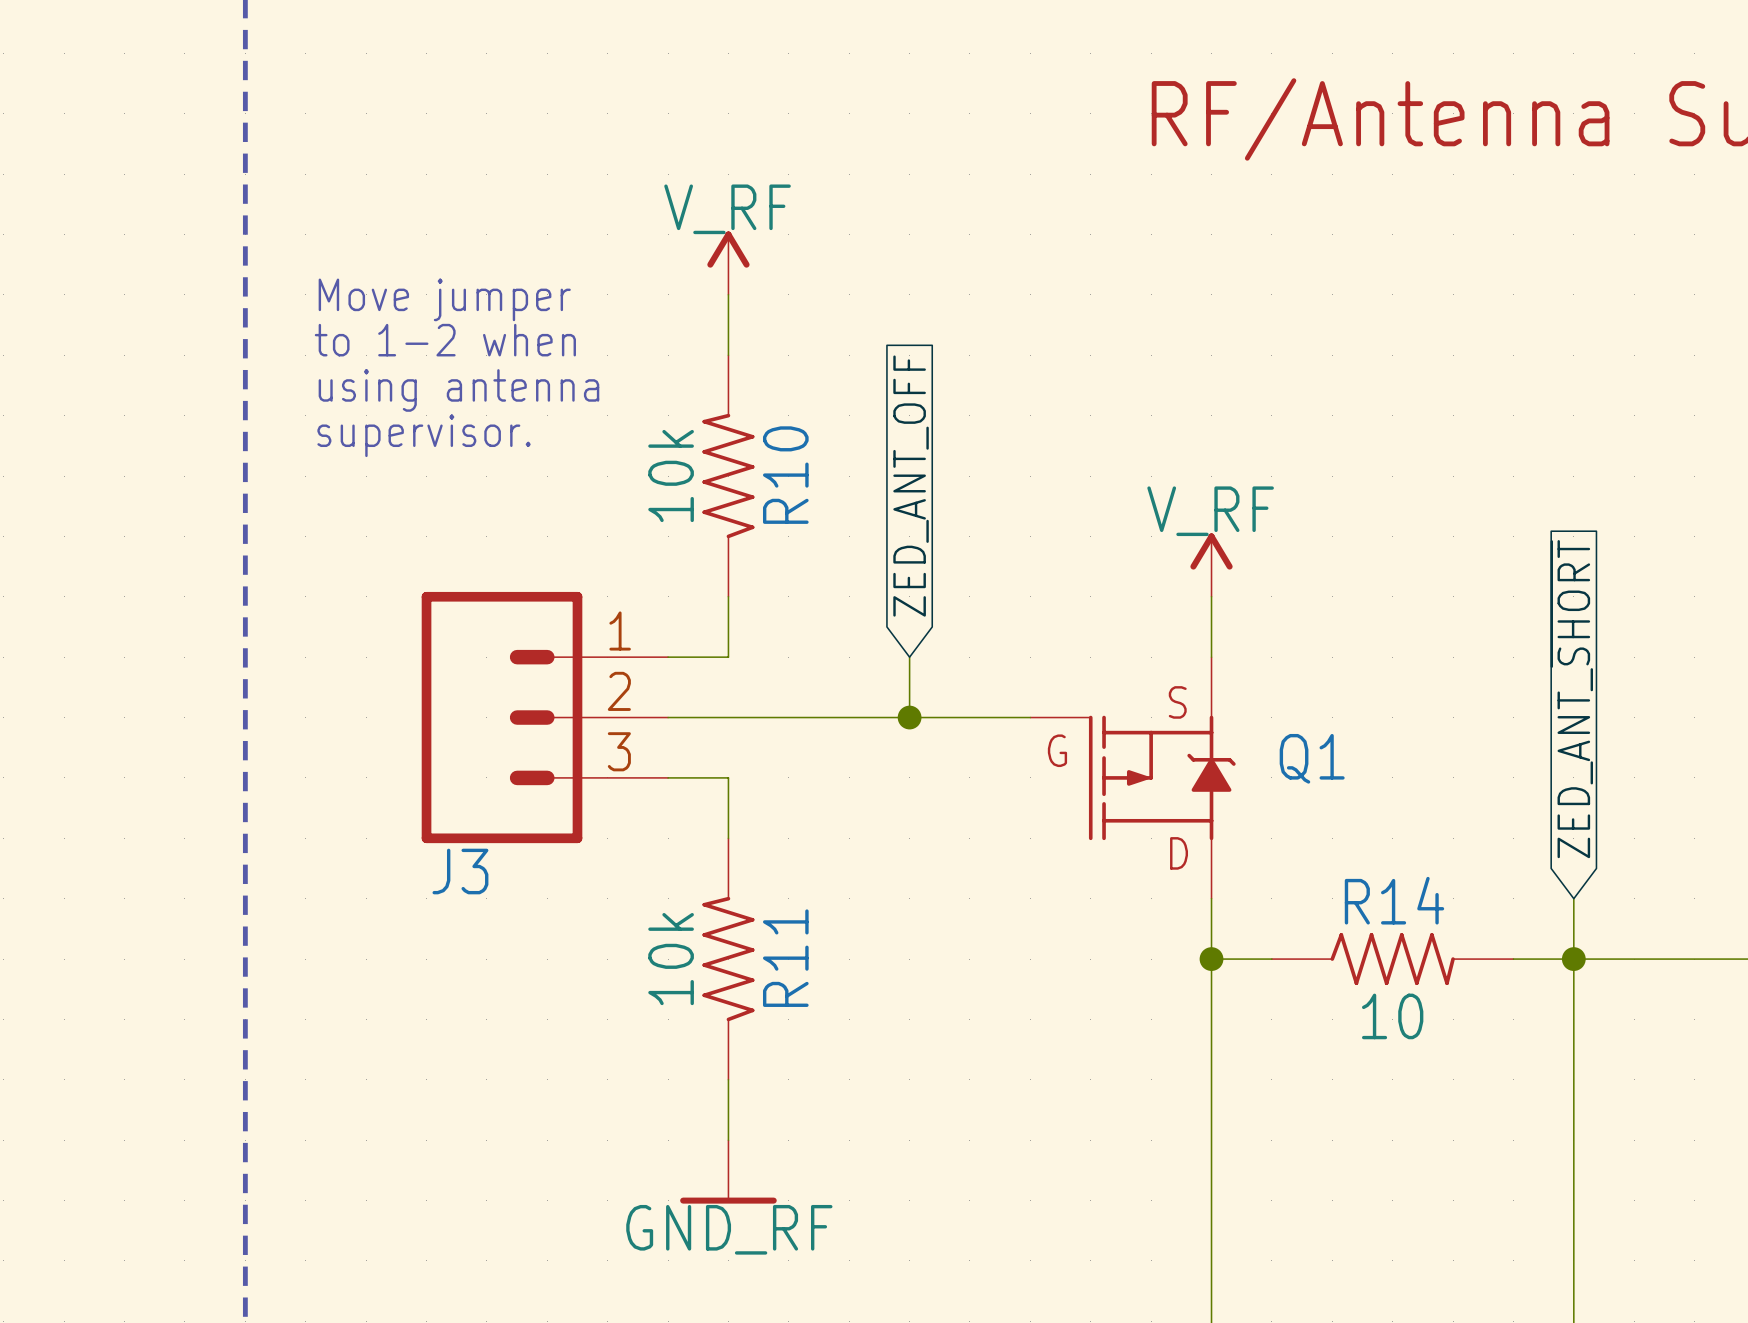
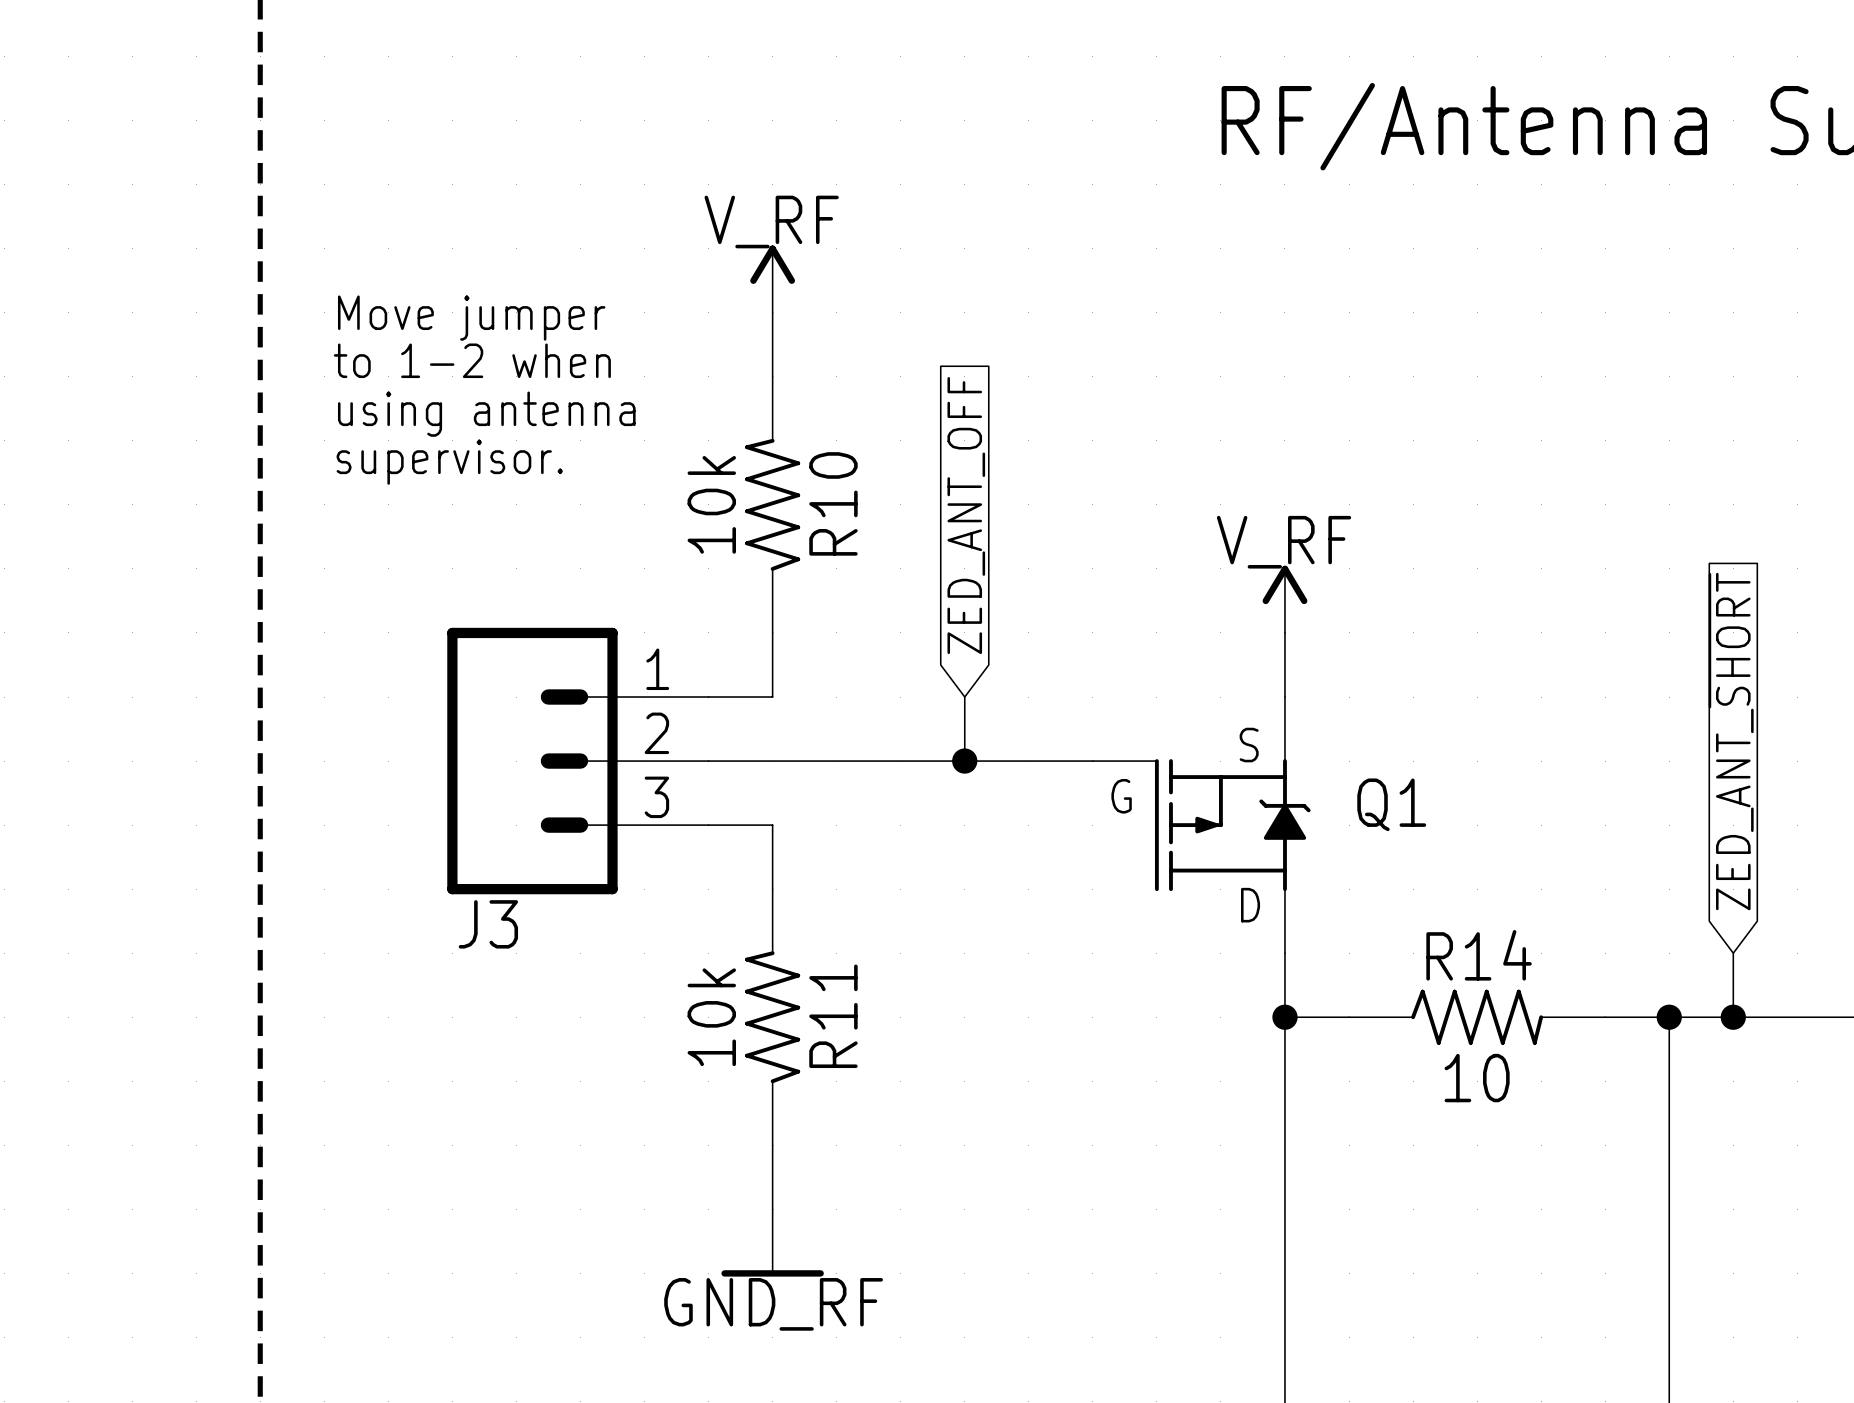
global label position: ZED_ANT_~{SHORT} (1571, 699) -> ZED_ANT_~{SHORT} (1731, 741)
wire: (1573, 898) (1573, 959) -> (1733, 953) (1733, 1017)
junction: none -> (1733, 1017)

